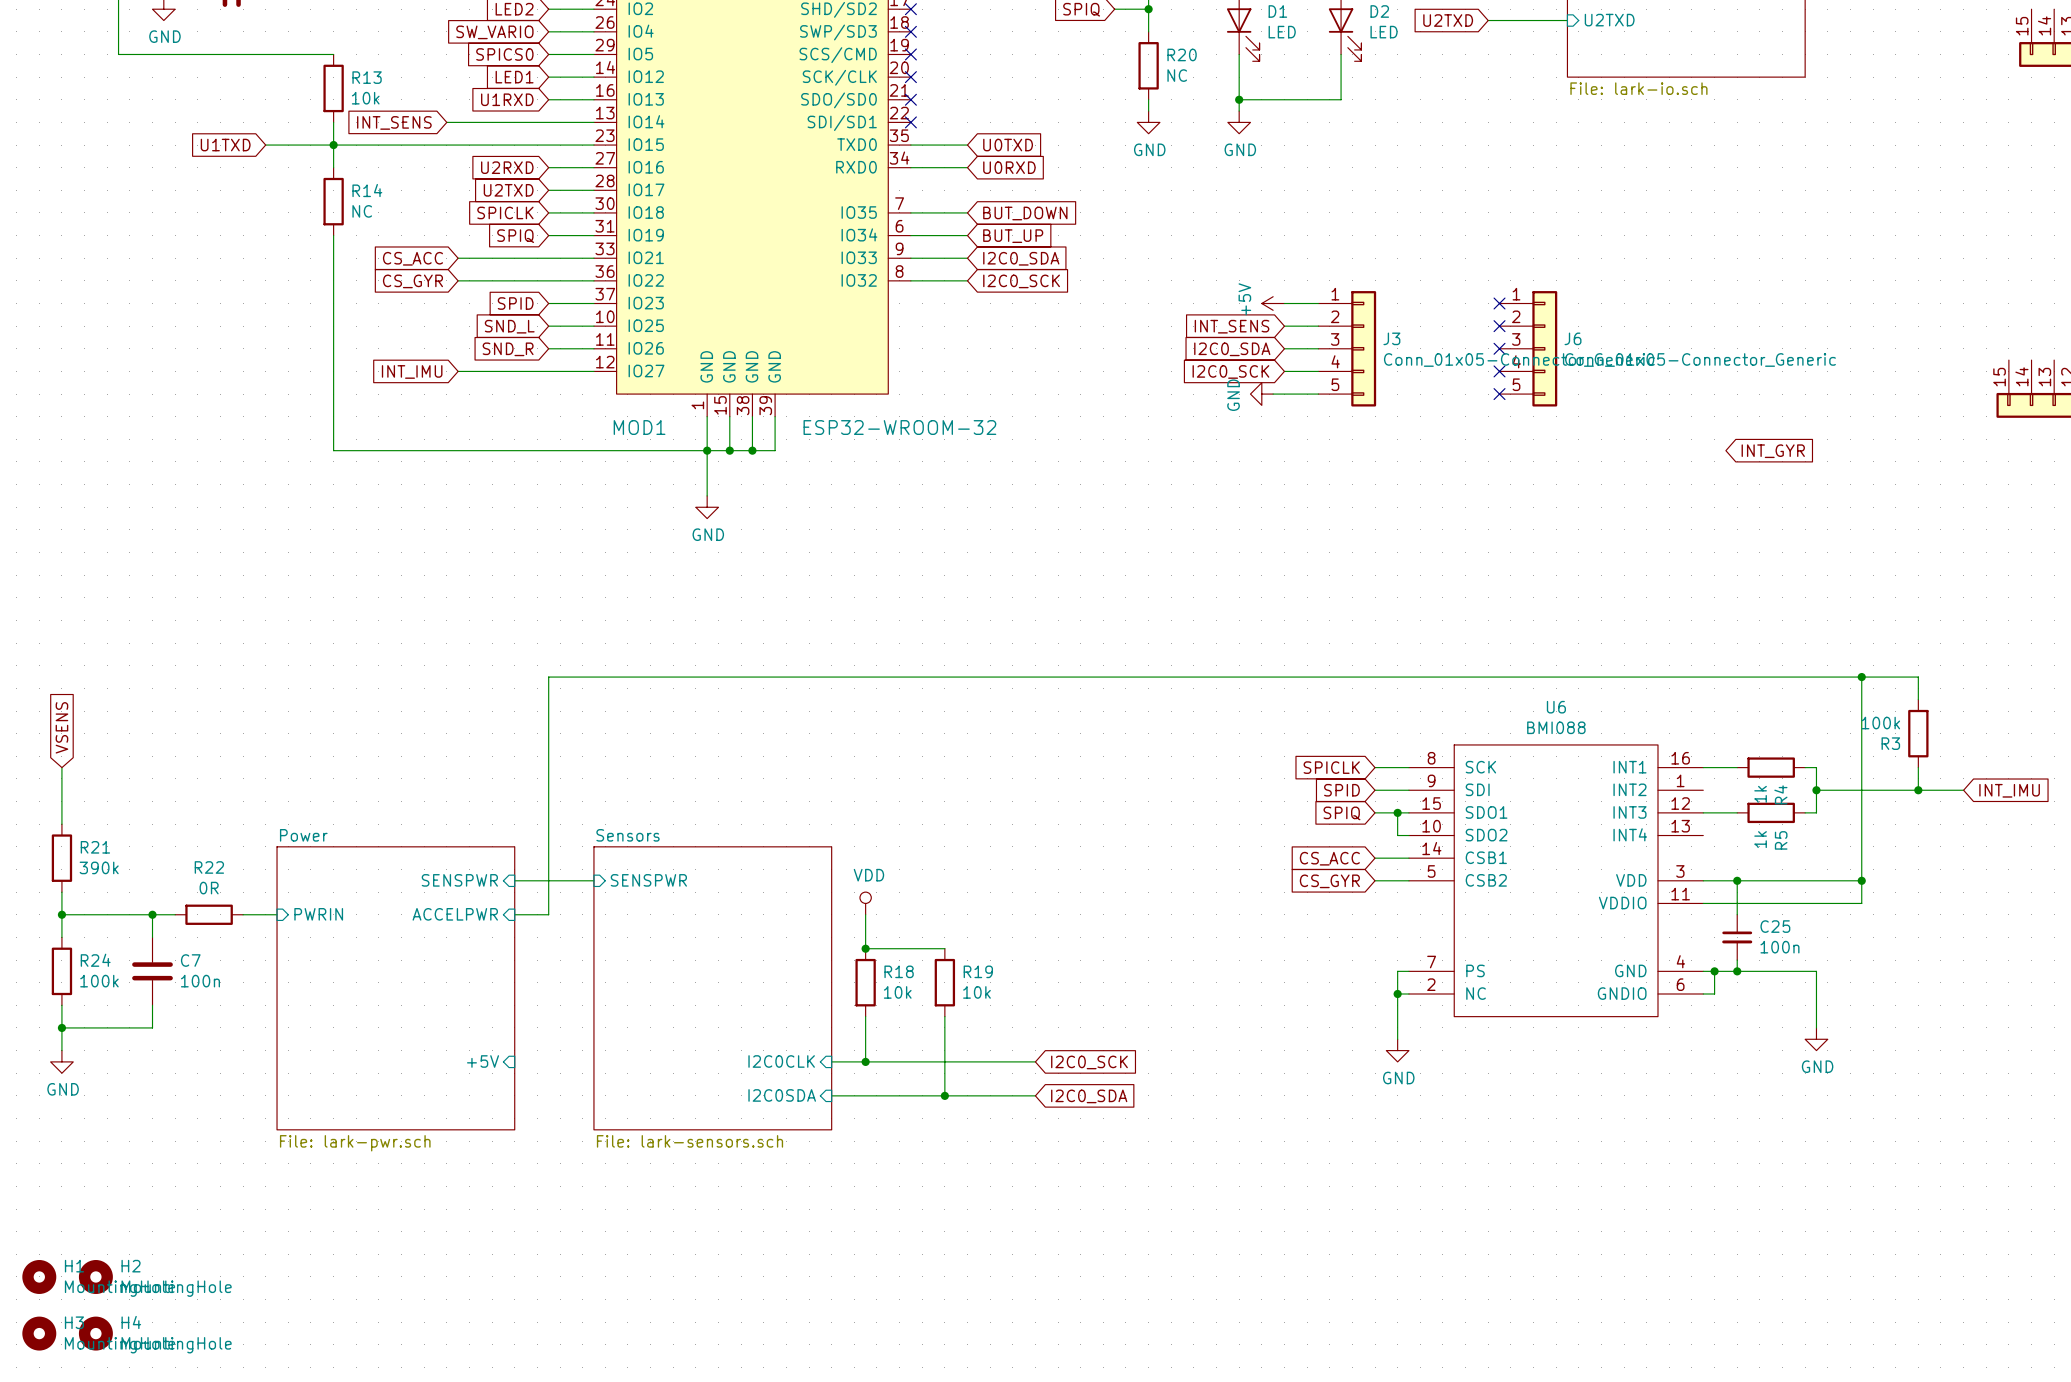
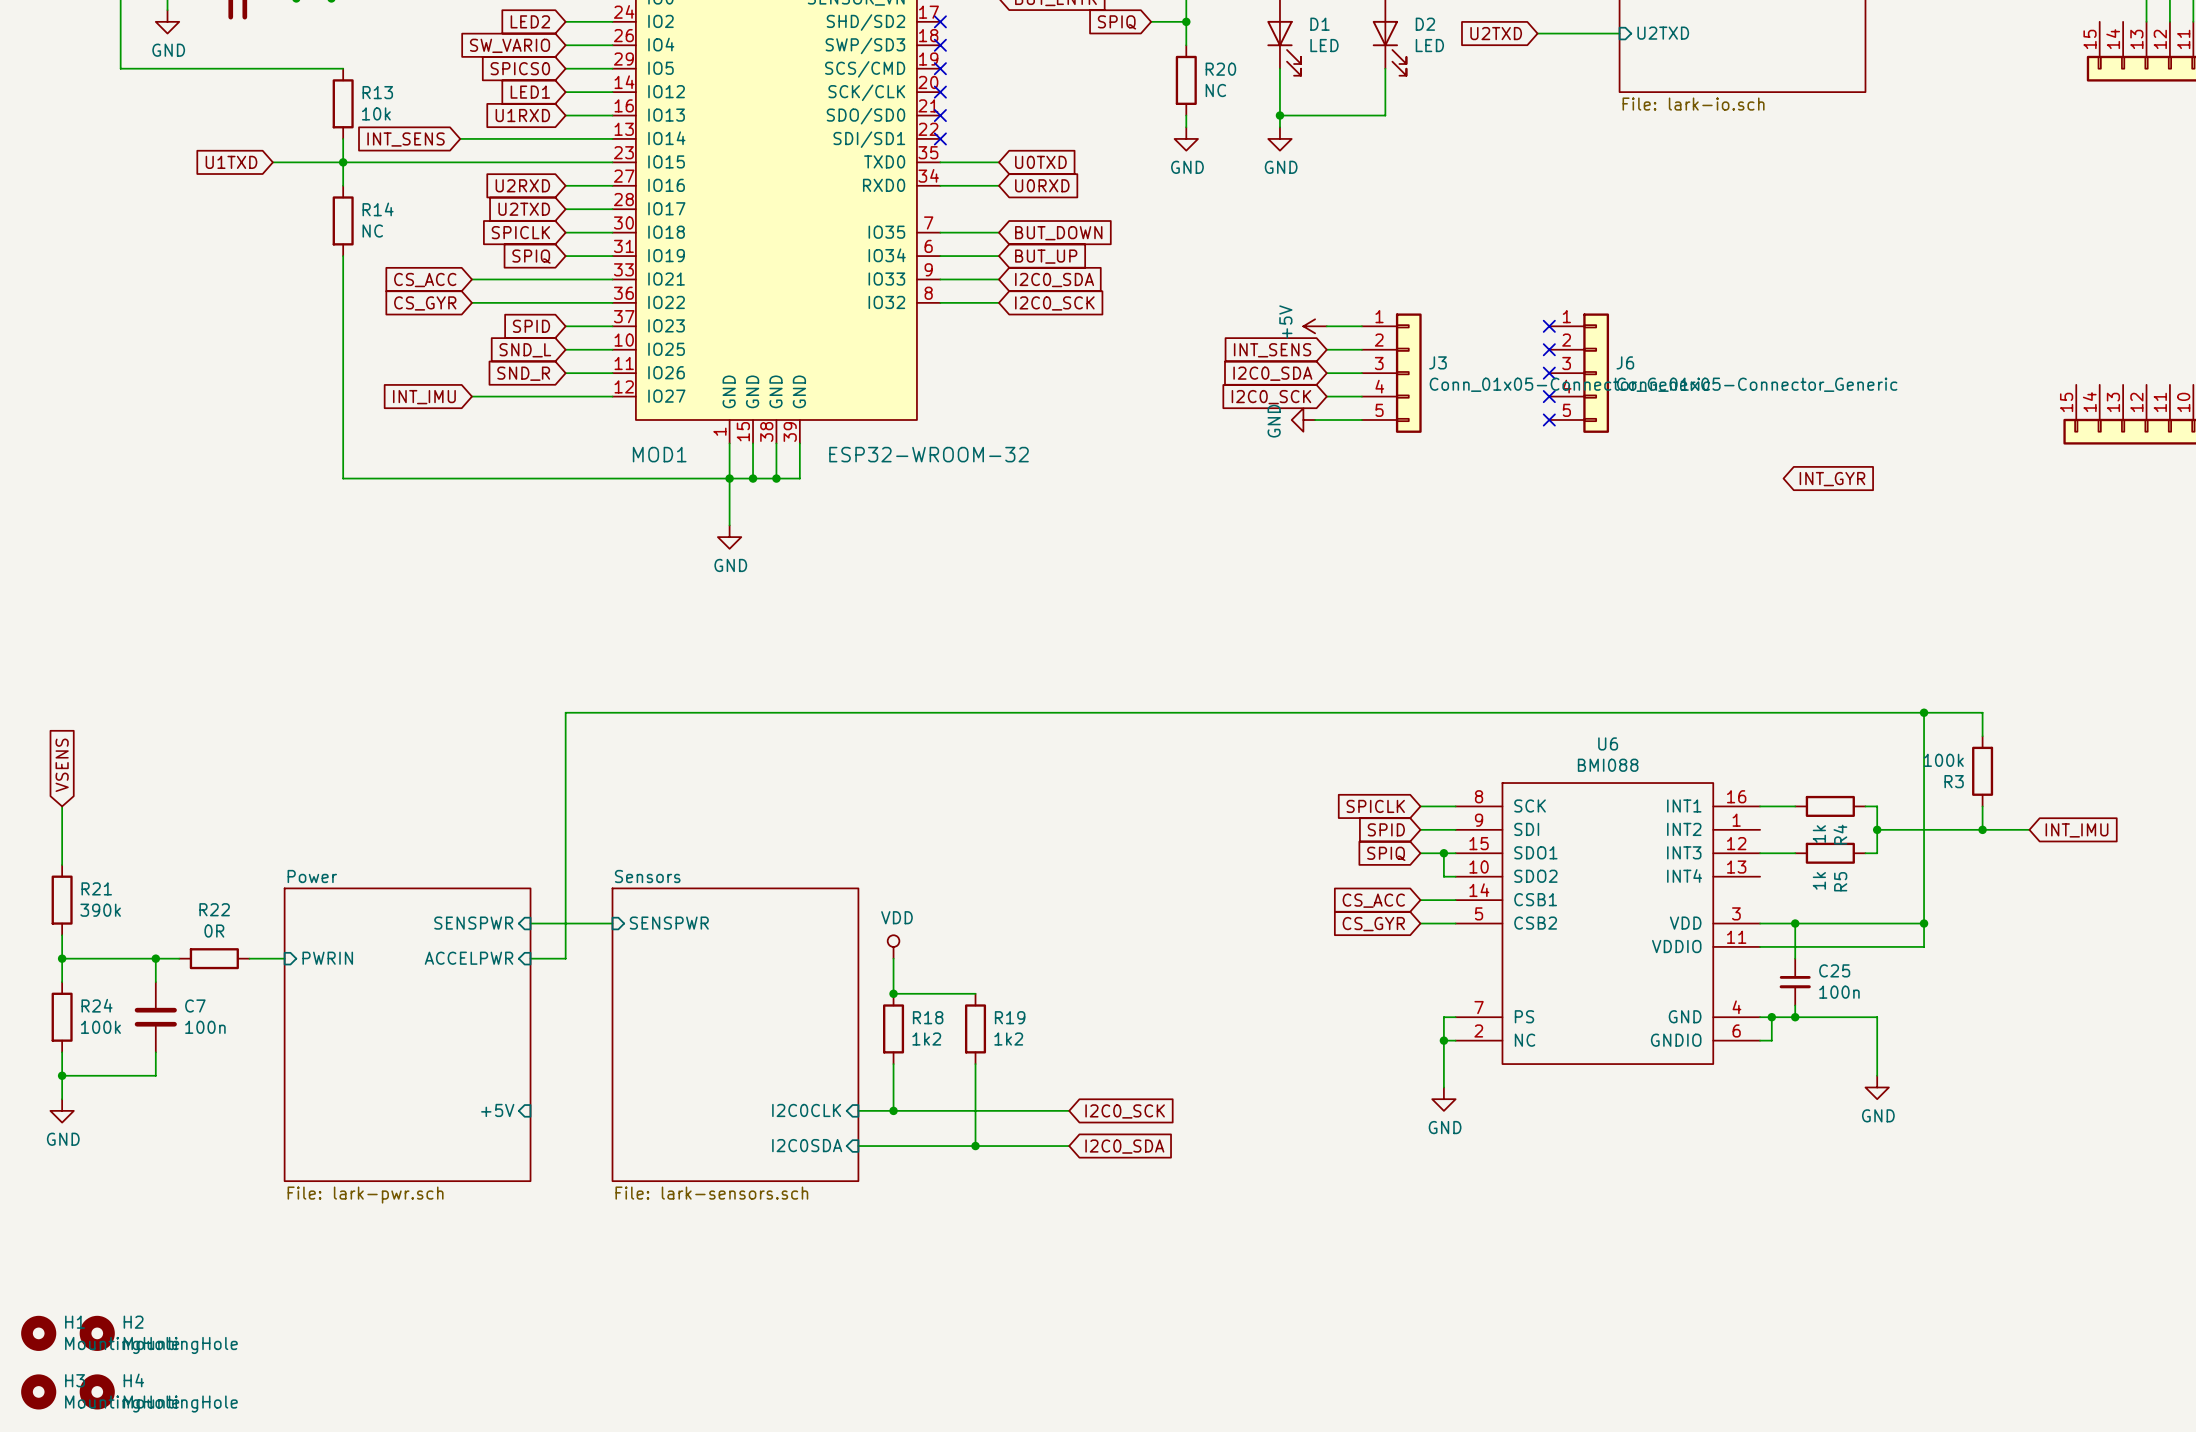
R18 value: 10k (897, 992) -> 1k2 (926, 1039)
R19 value: 10k (976, 992) -> 1k2 (1008, 1039)

